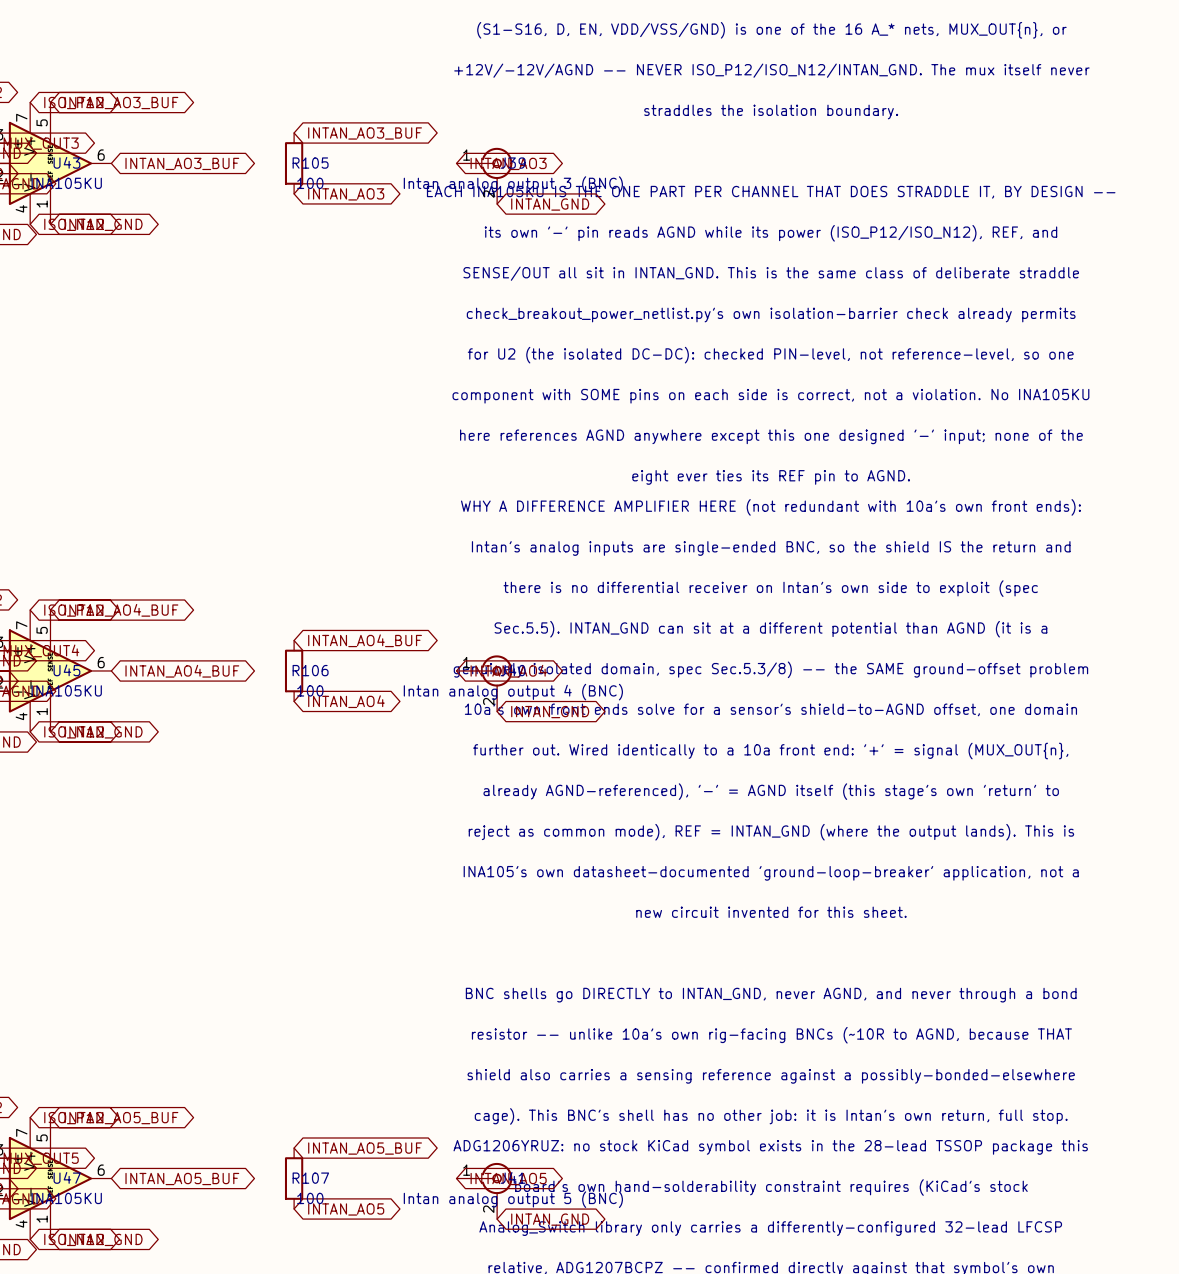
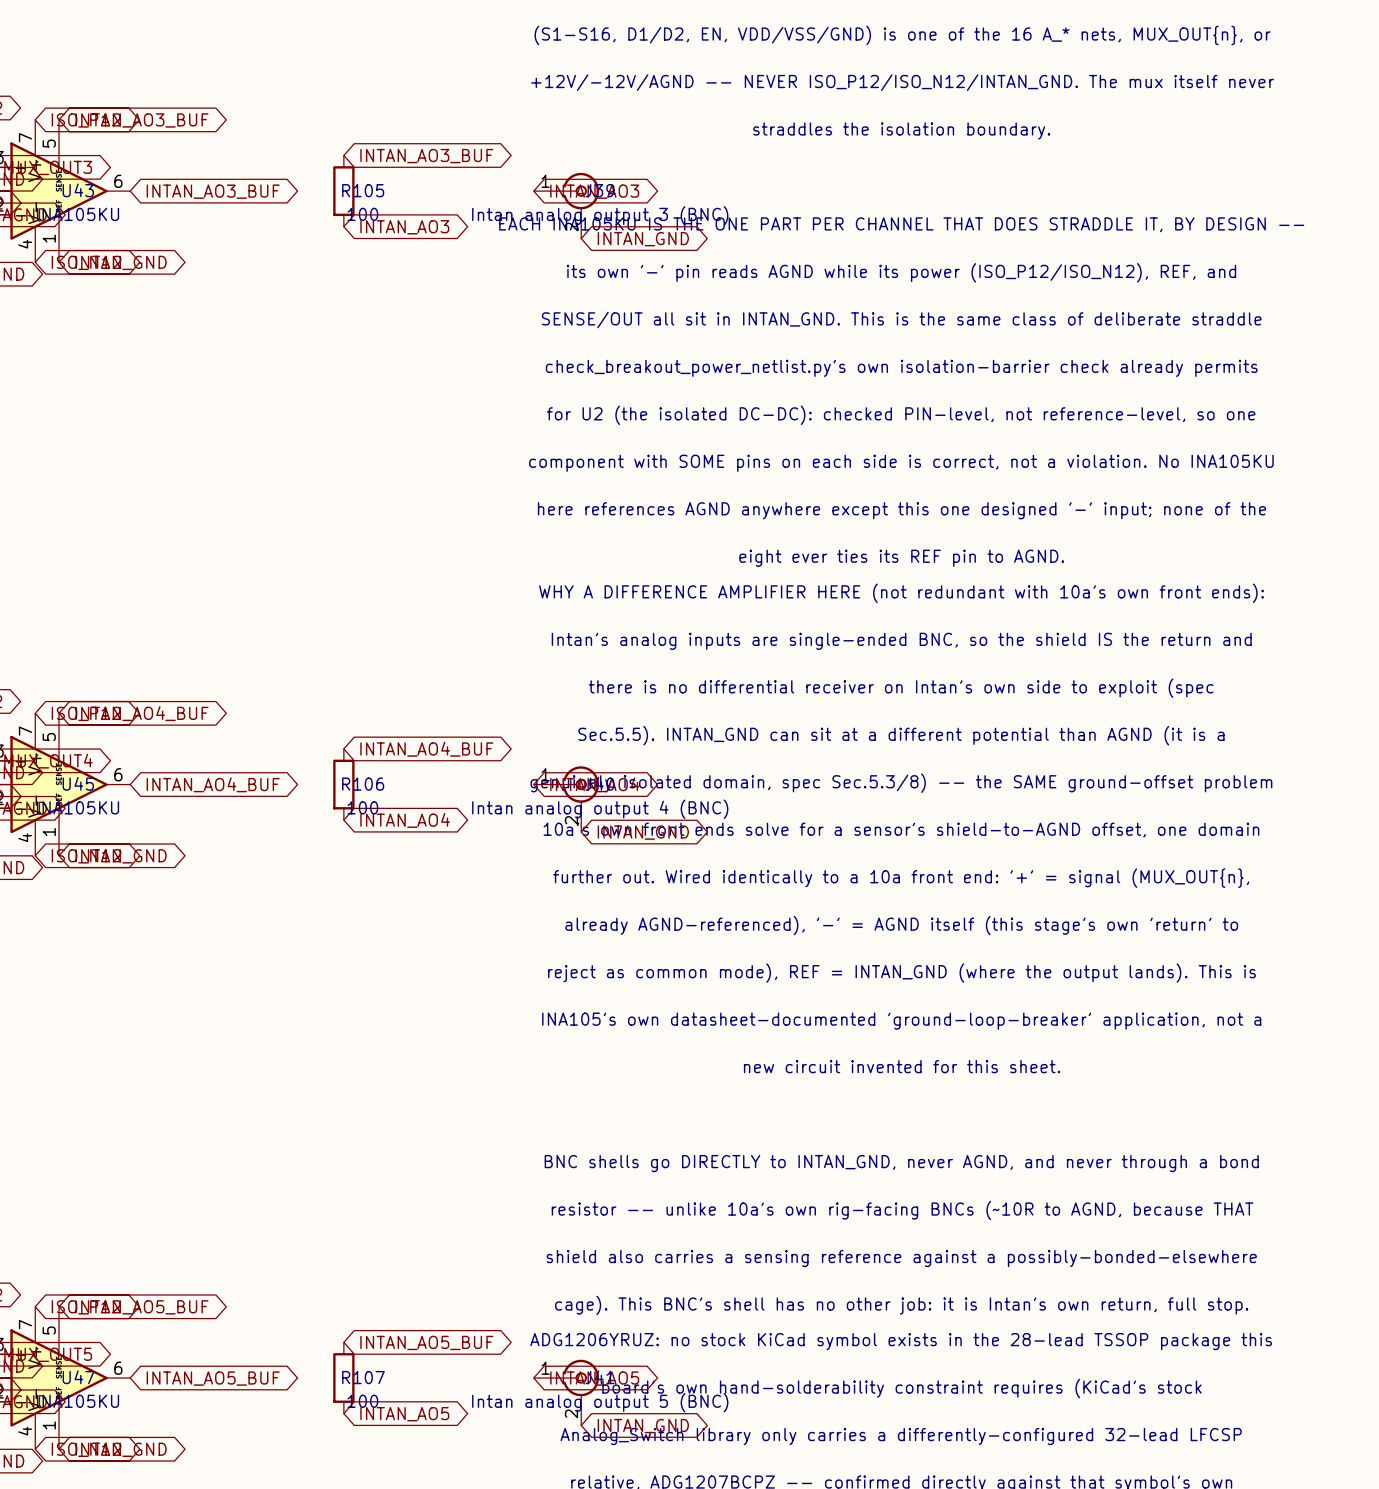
text: (S1-S16, D, EN, VDD/VSS/GND) is one of the 16 A_* nets, MUX_OUT{n}, or (771, 30) -> (S1-S16, D1/D2, EN, VDD/VSS/GND) is one of the 16 A_* nets, MUX_OUT{n}, or (902, 35)

